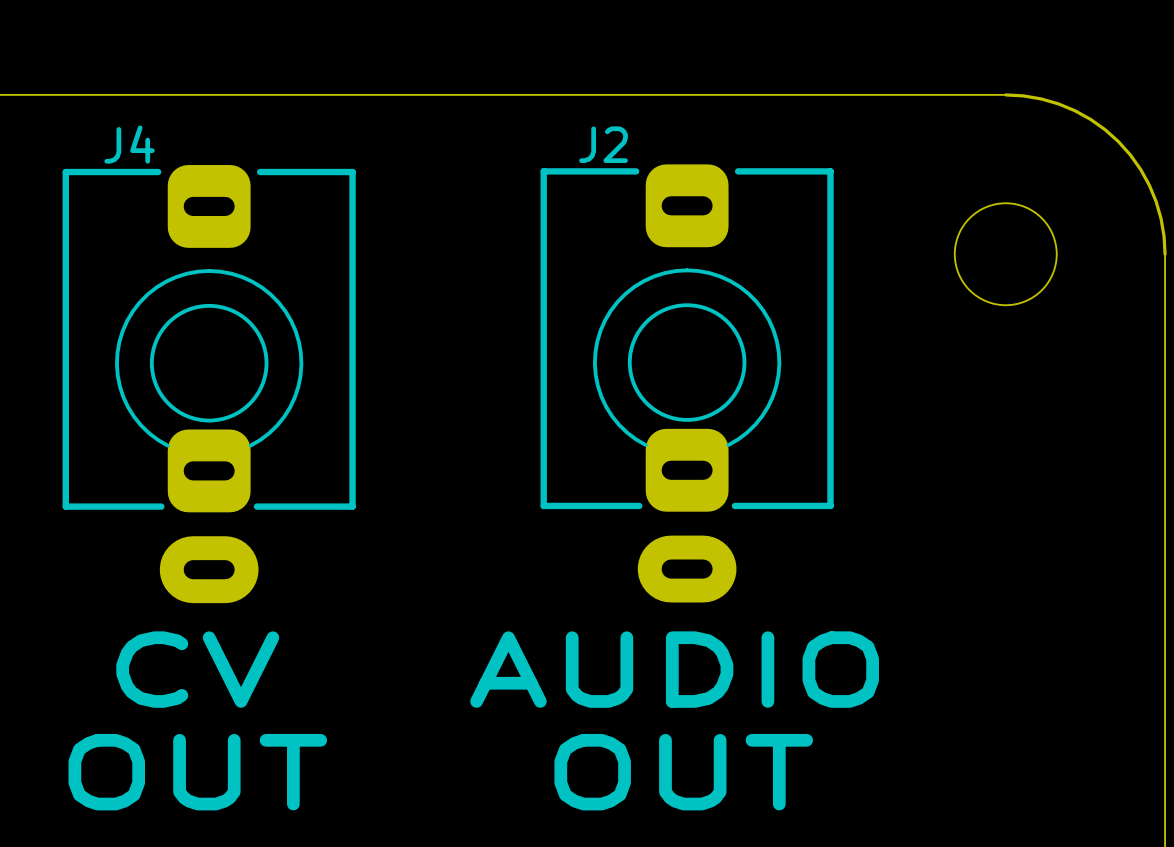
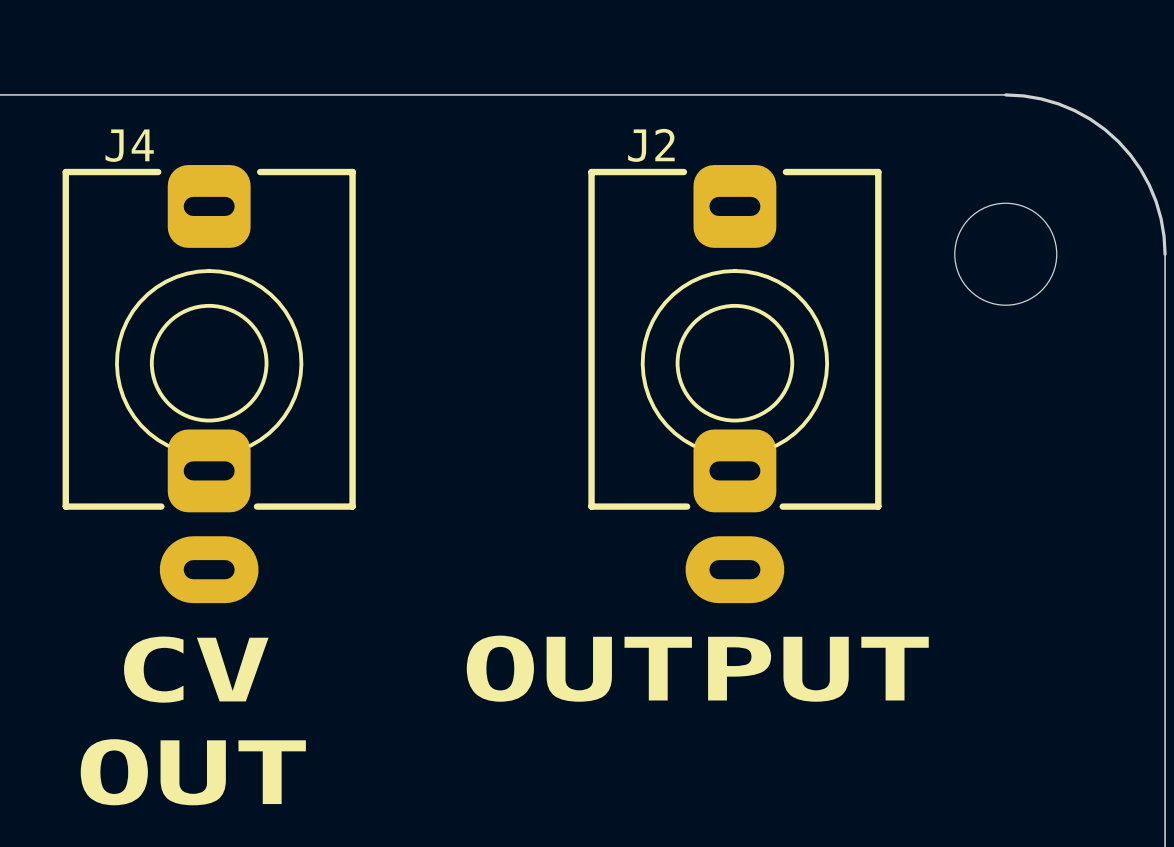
J2 position: (687, 383) -> (734, 384)
text: AUDIO (674, 669) -> none
text: OUT (683, 772) -> OUTPUT (697, 668)

